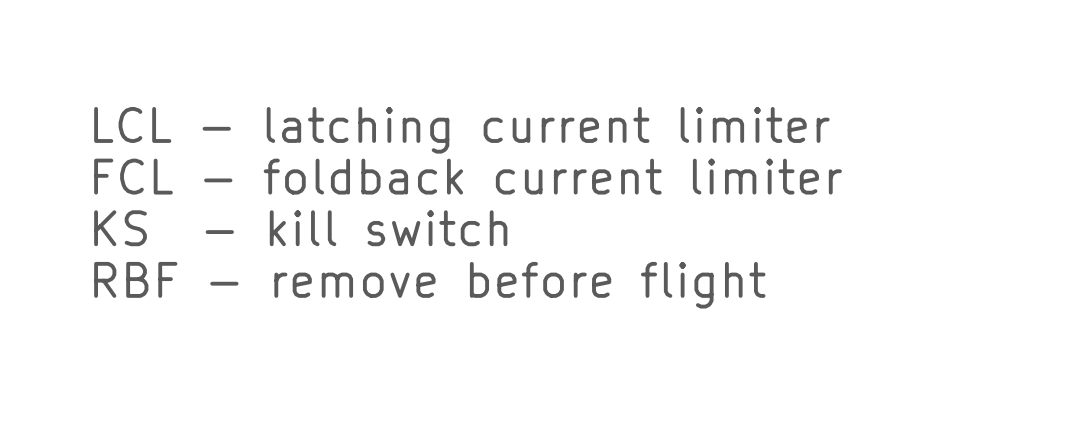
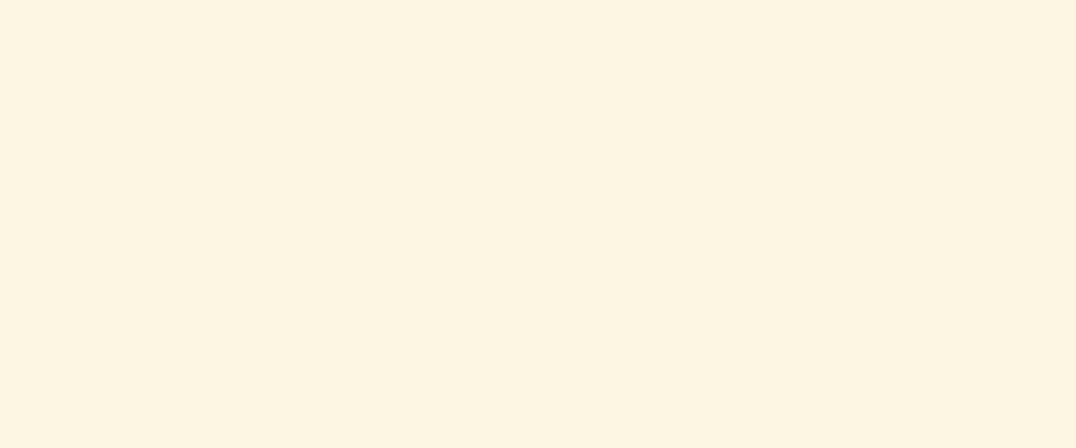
text: LCL - latching current limiter (461, 130) -> none
text: FCL - foldback current limiter (468, 176) -> none
text: KS - kill switch (300, 228) -> none
text: RBF - remove before flight (429, 285) -> none

